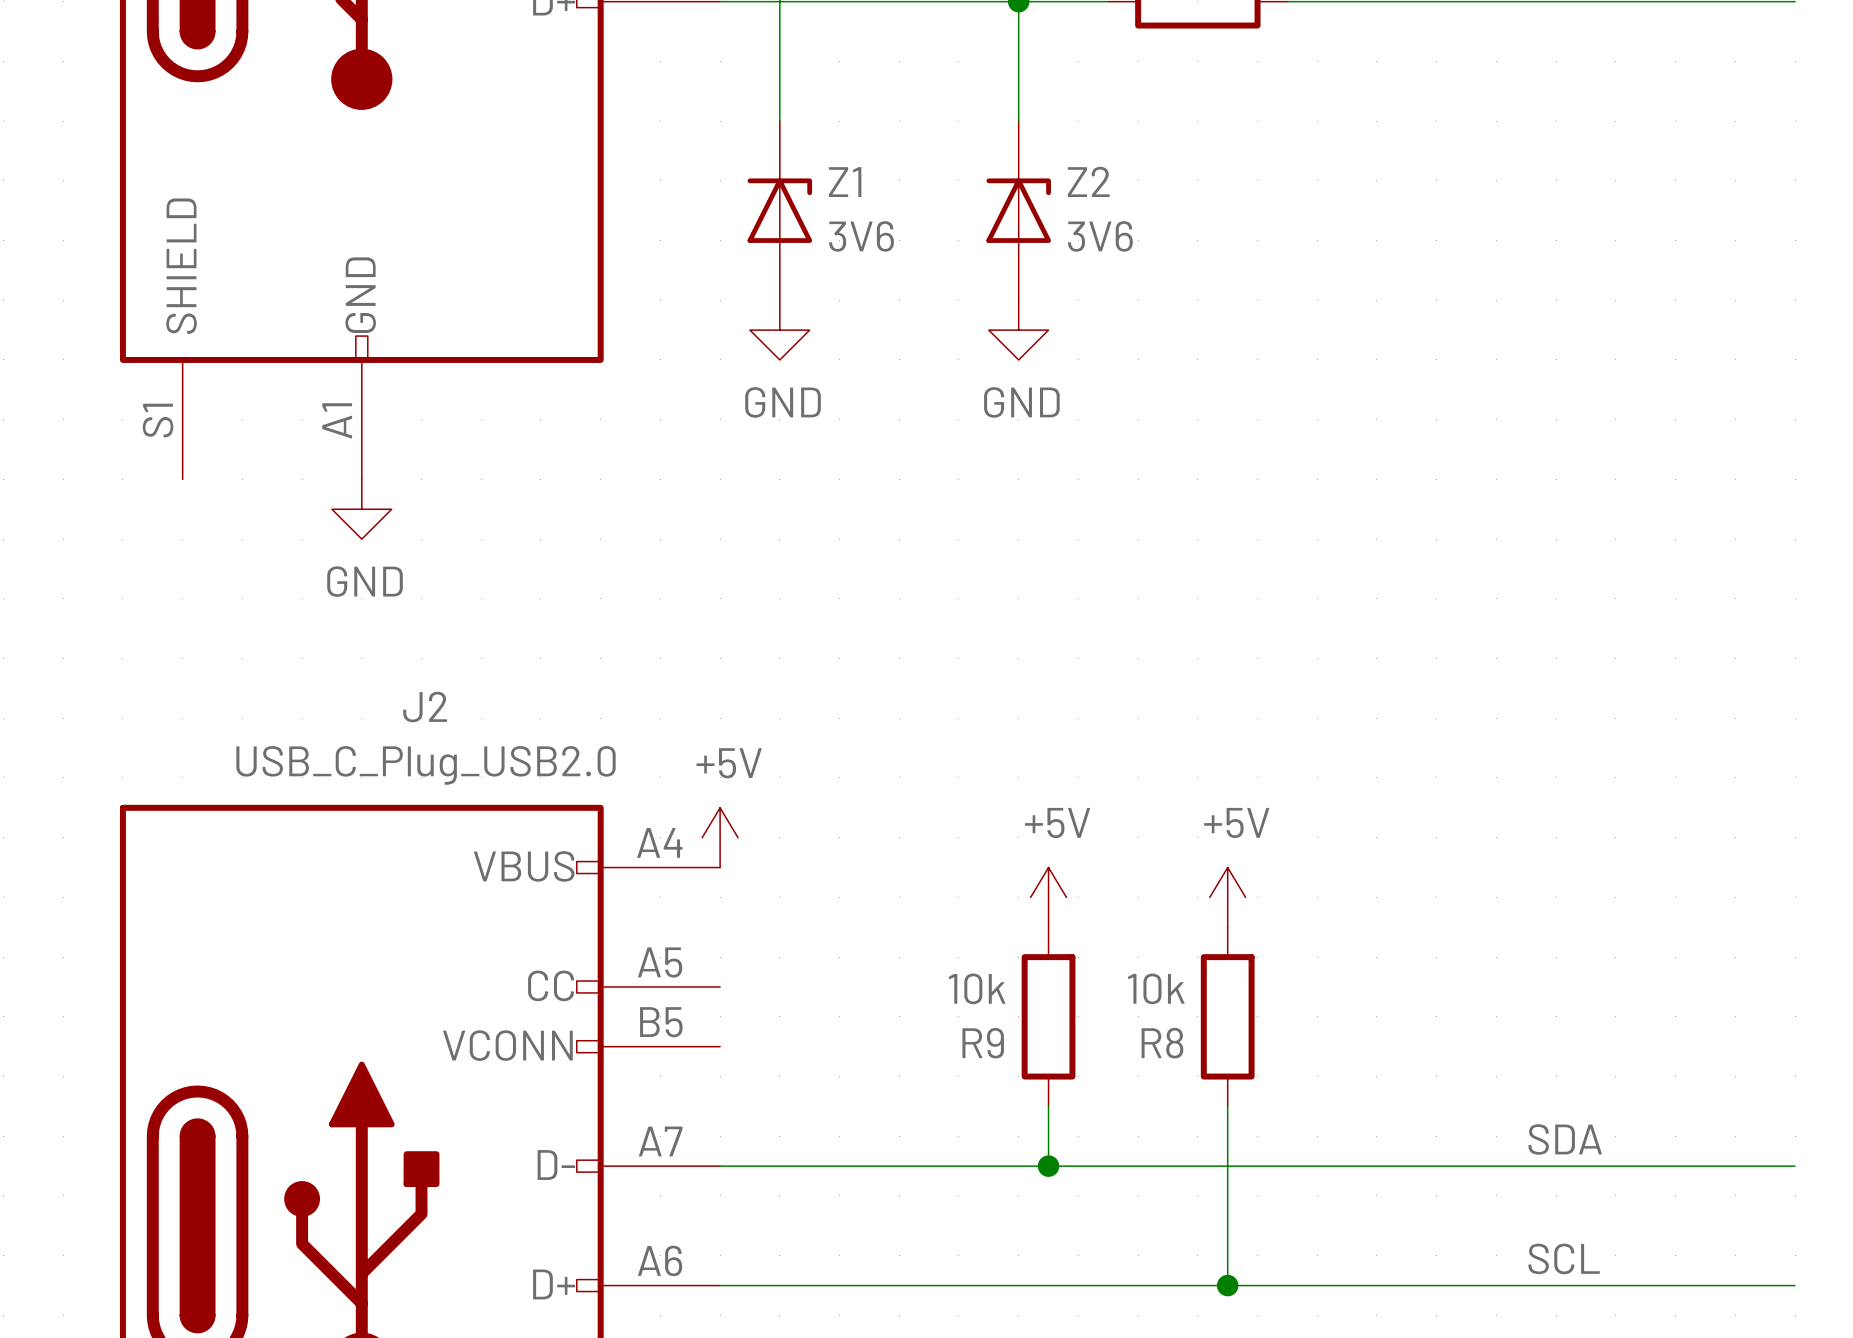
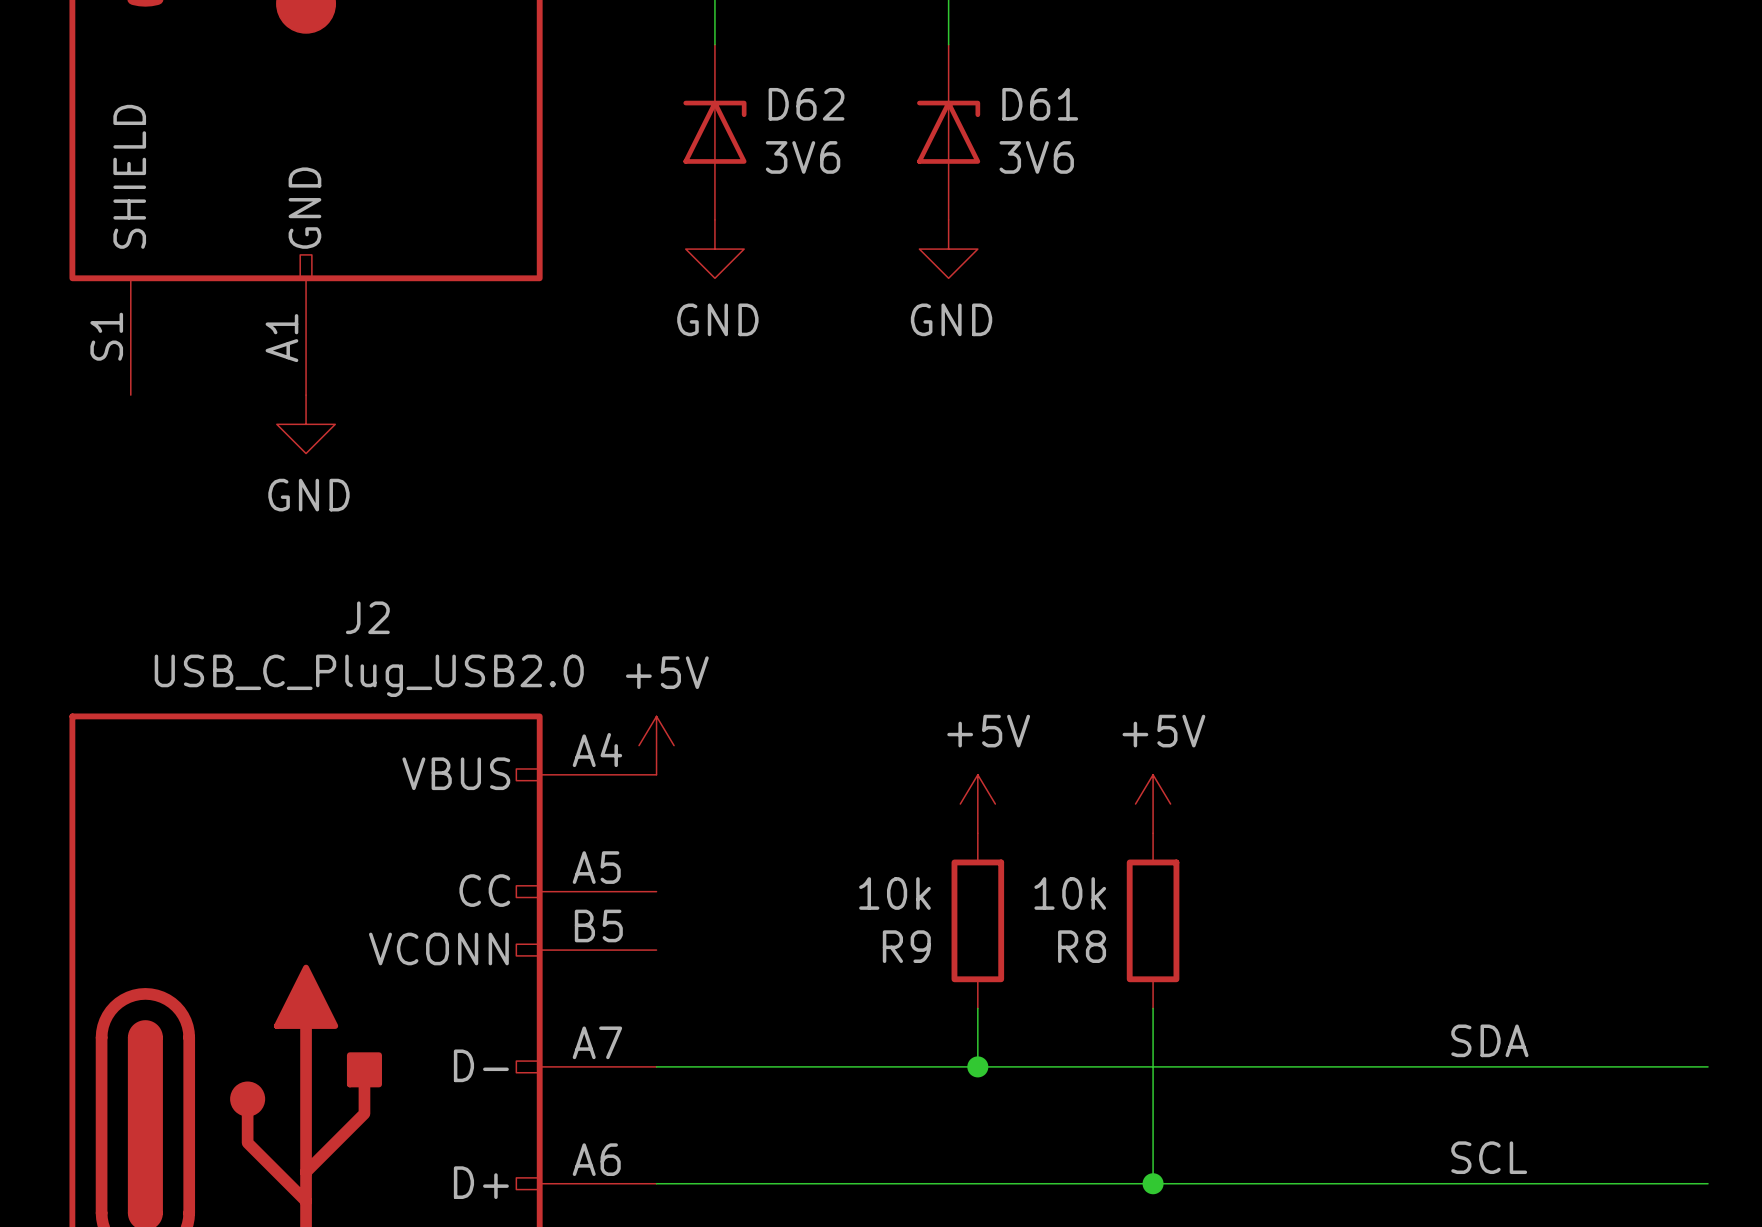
Z2 name: Z2 (1088, 181) -> D61 (1040, 104)
Z1 name: Z1 (845, 182) -> D62 (806, 104)

